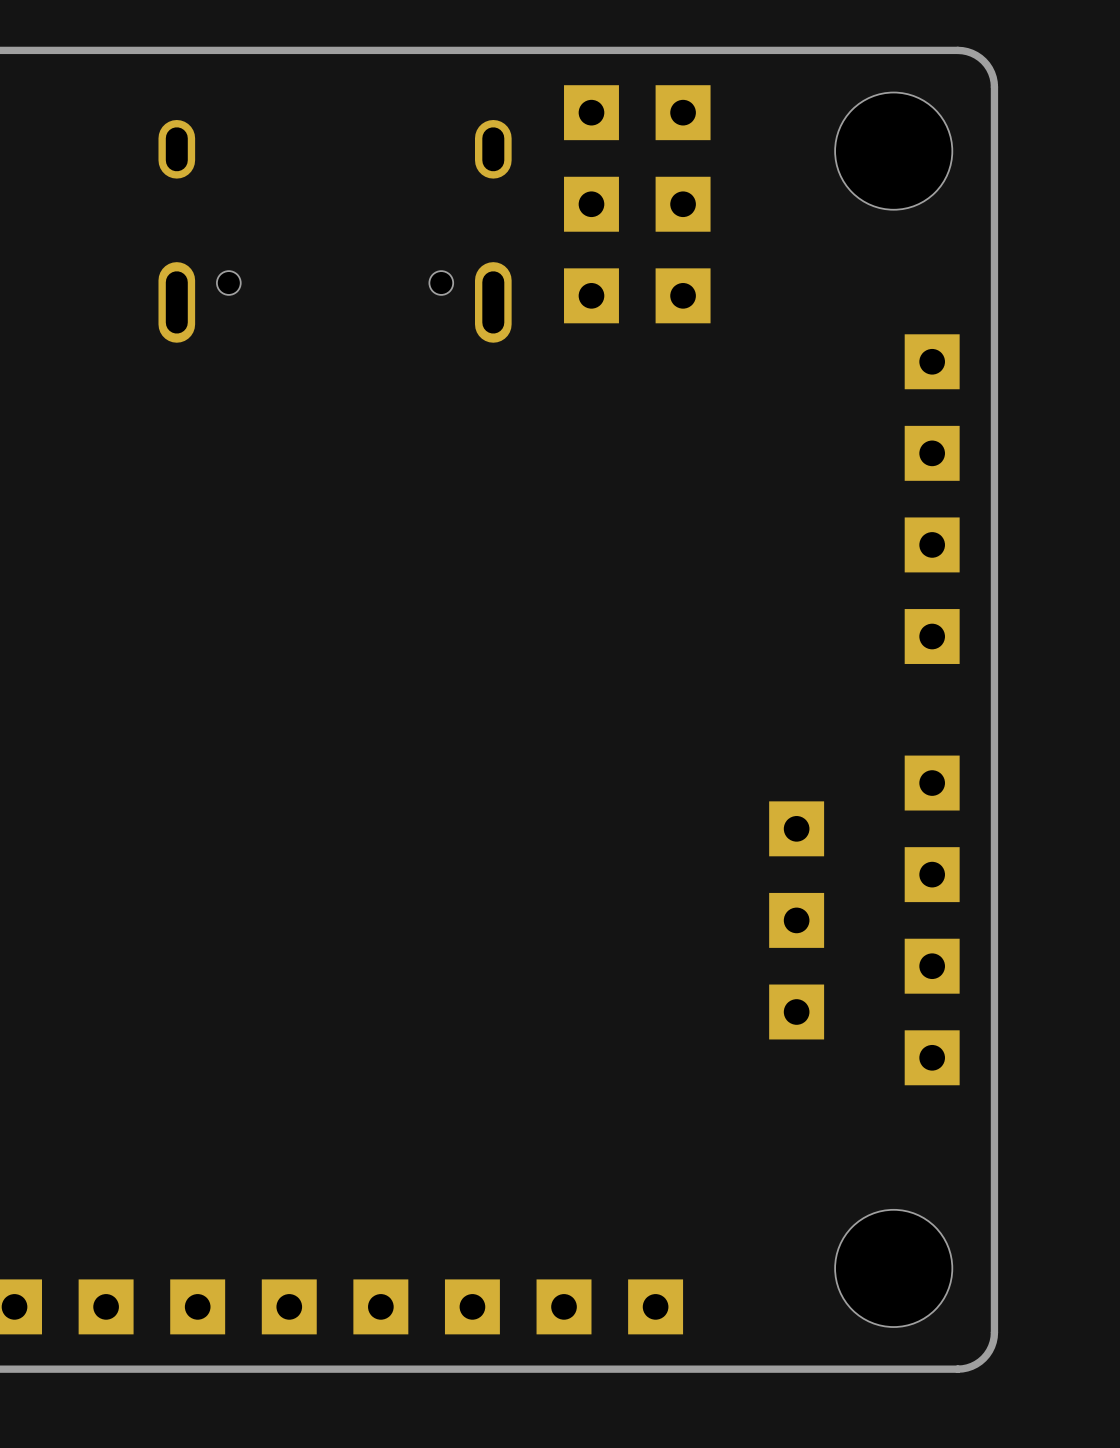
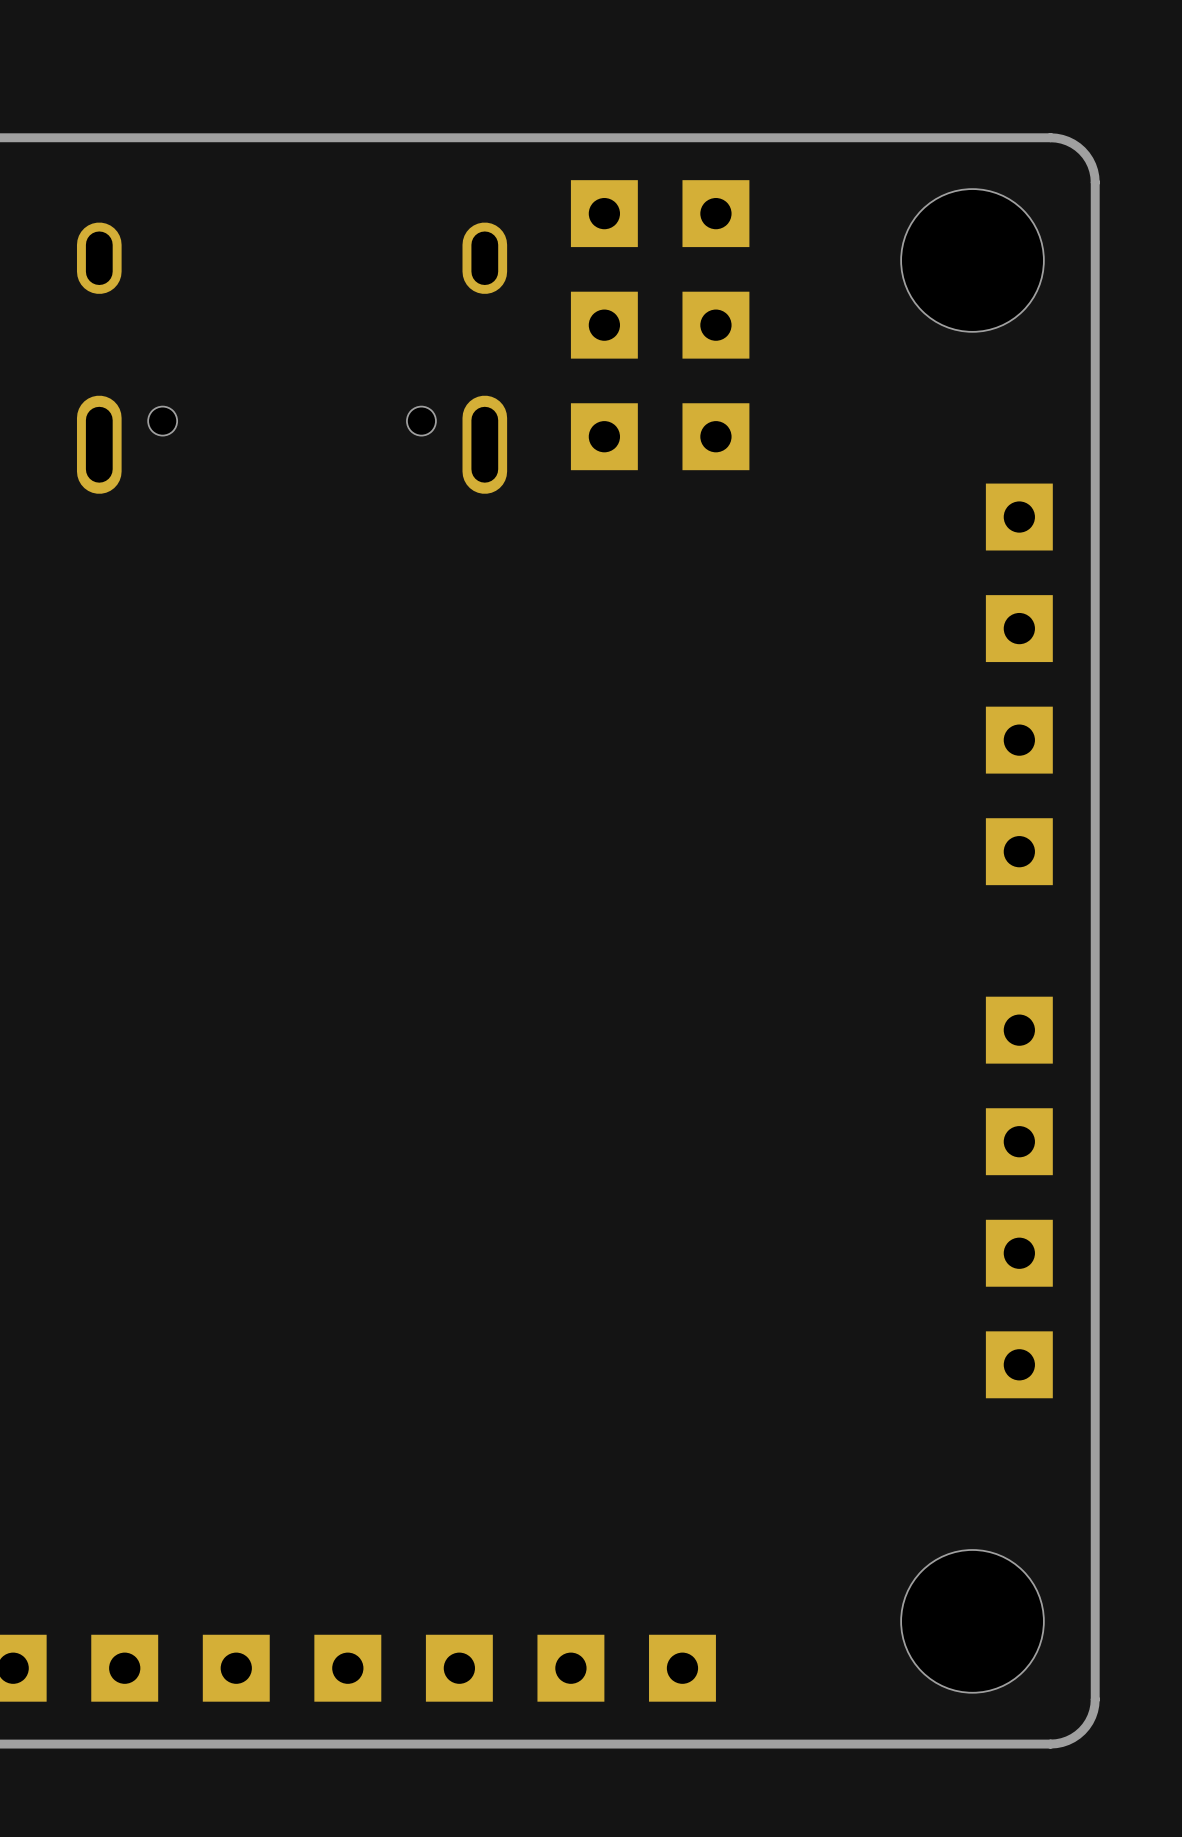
part: (796, 828) -> none
part: (796, 920) -> none
part: (796, 1011) -> none

